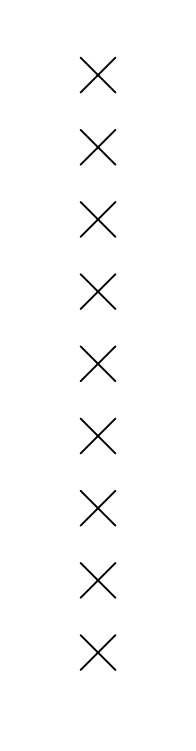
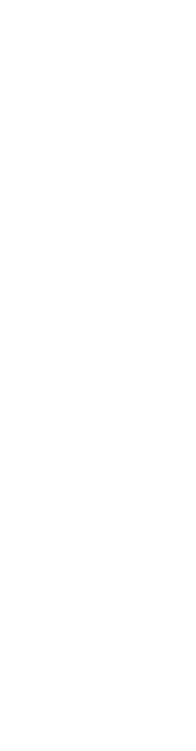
no-connect mark: (98, 75) -> none
no-connect mark: (98, 147) -> none
no-connect mark: (98, 219) -> none
no-connect mark: (98, 291) -> none
no-connect mark: (98, 363) -> none
no-connect mark: (98, 436) -> none
no-connect mark: (98, 508) -> none
no-connect mark: (98, 580) -> none
no-connect mark: (98, 652) -> none

